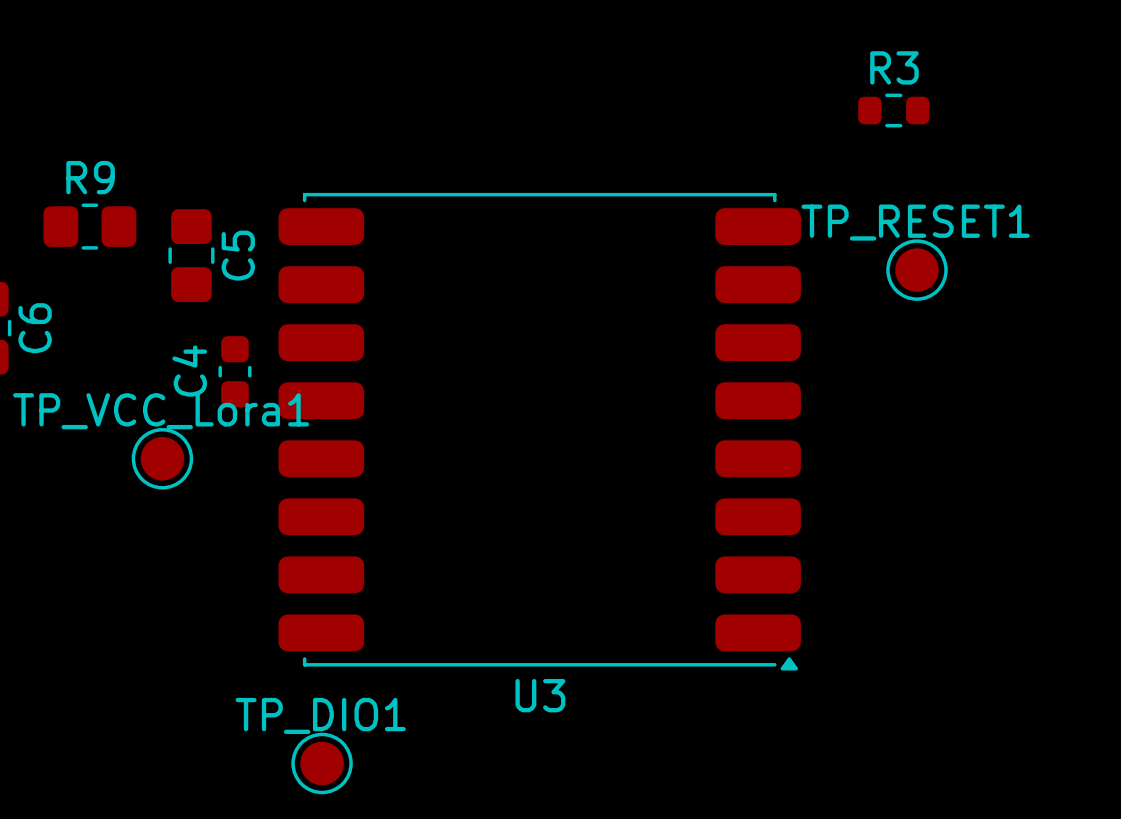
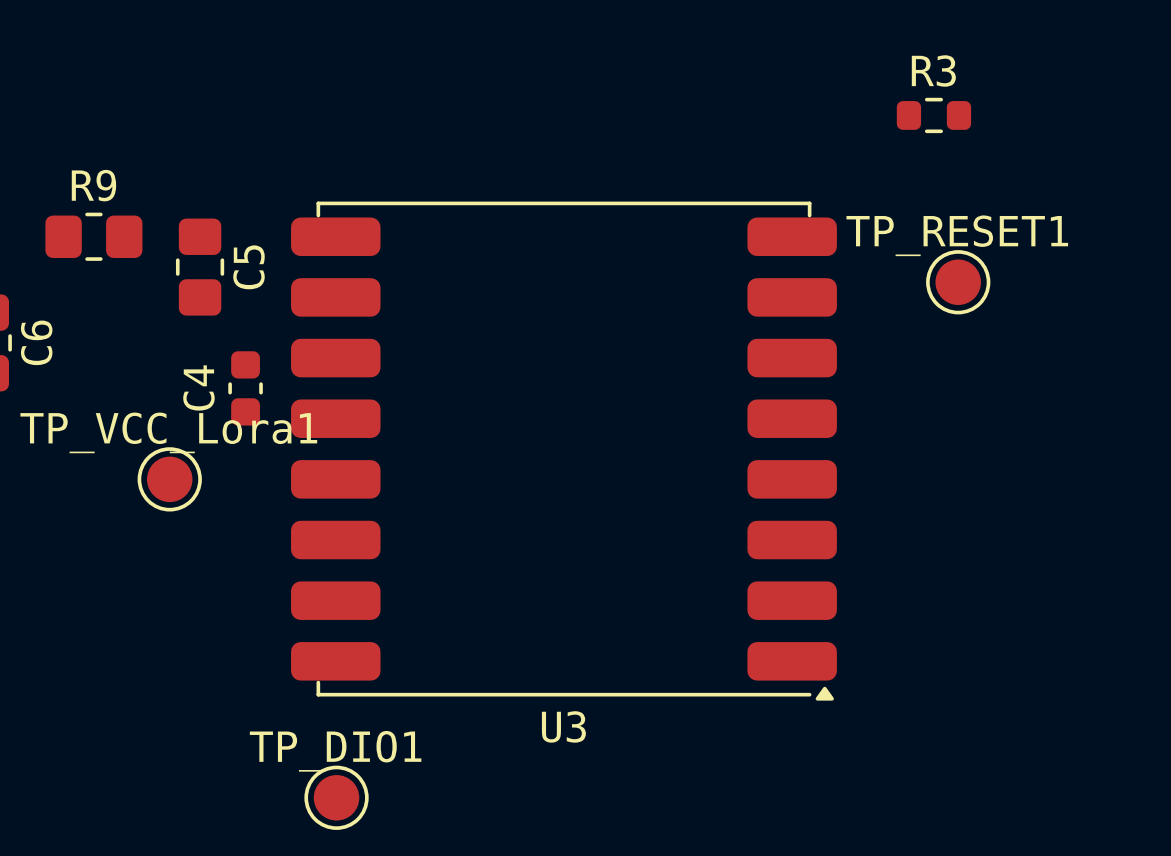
U3 footprint: [278, 192, 801, 671] -> [291, 201, 837, 701]

